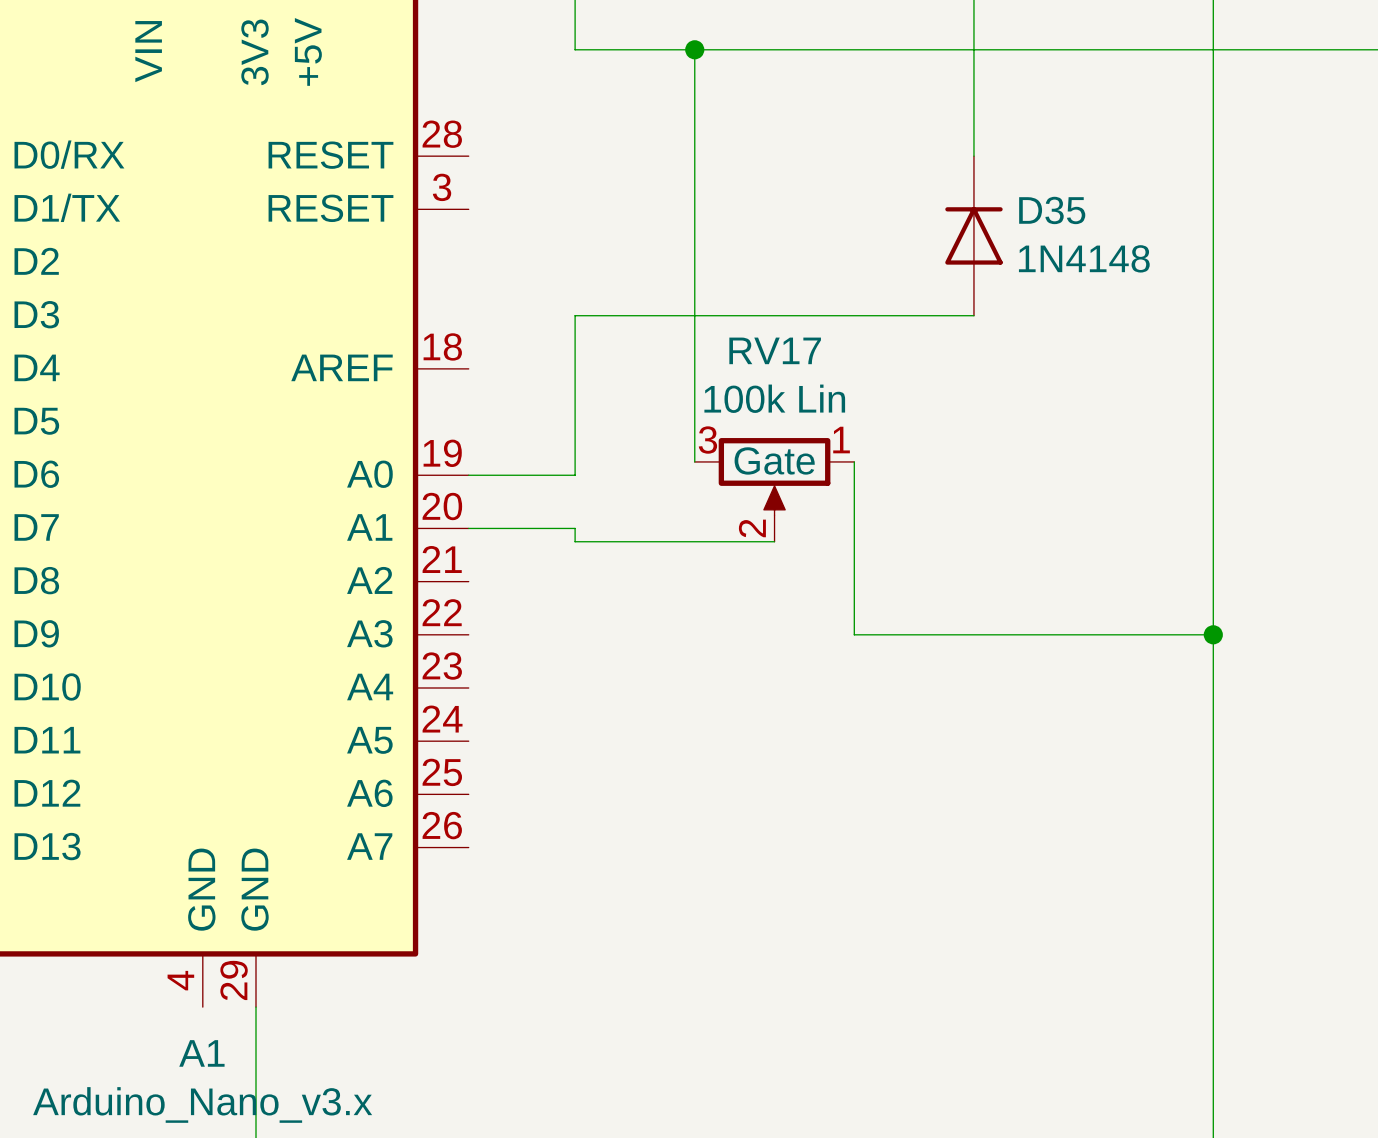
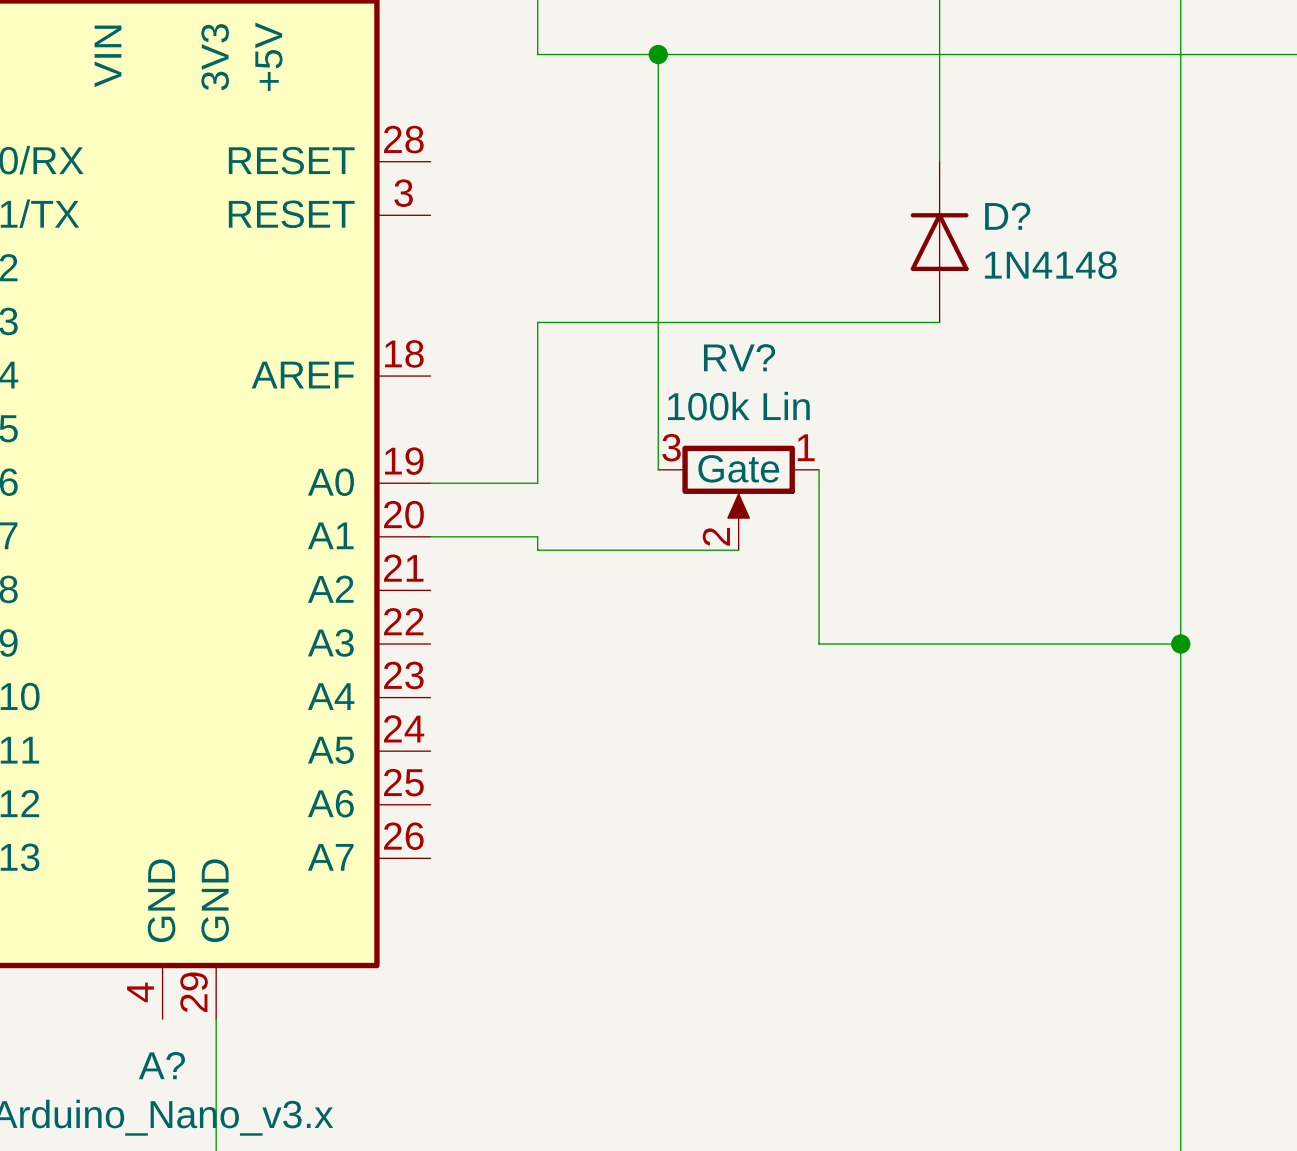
D35 name: D35 (1052, 210) -> D? (1007, 216)
RV17 name: RV17 (775, 350) -> RV? (739, 357)
A1 name: A1 (201, 1053) -> A? (161, 1065)

